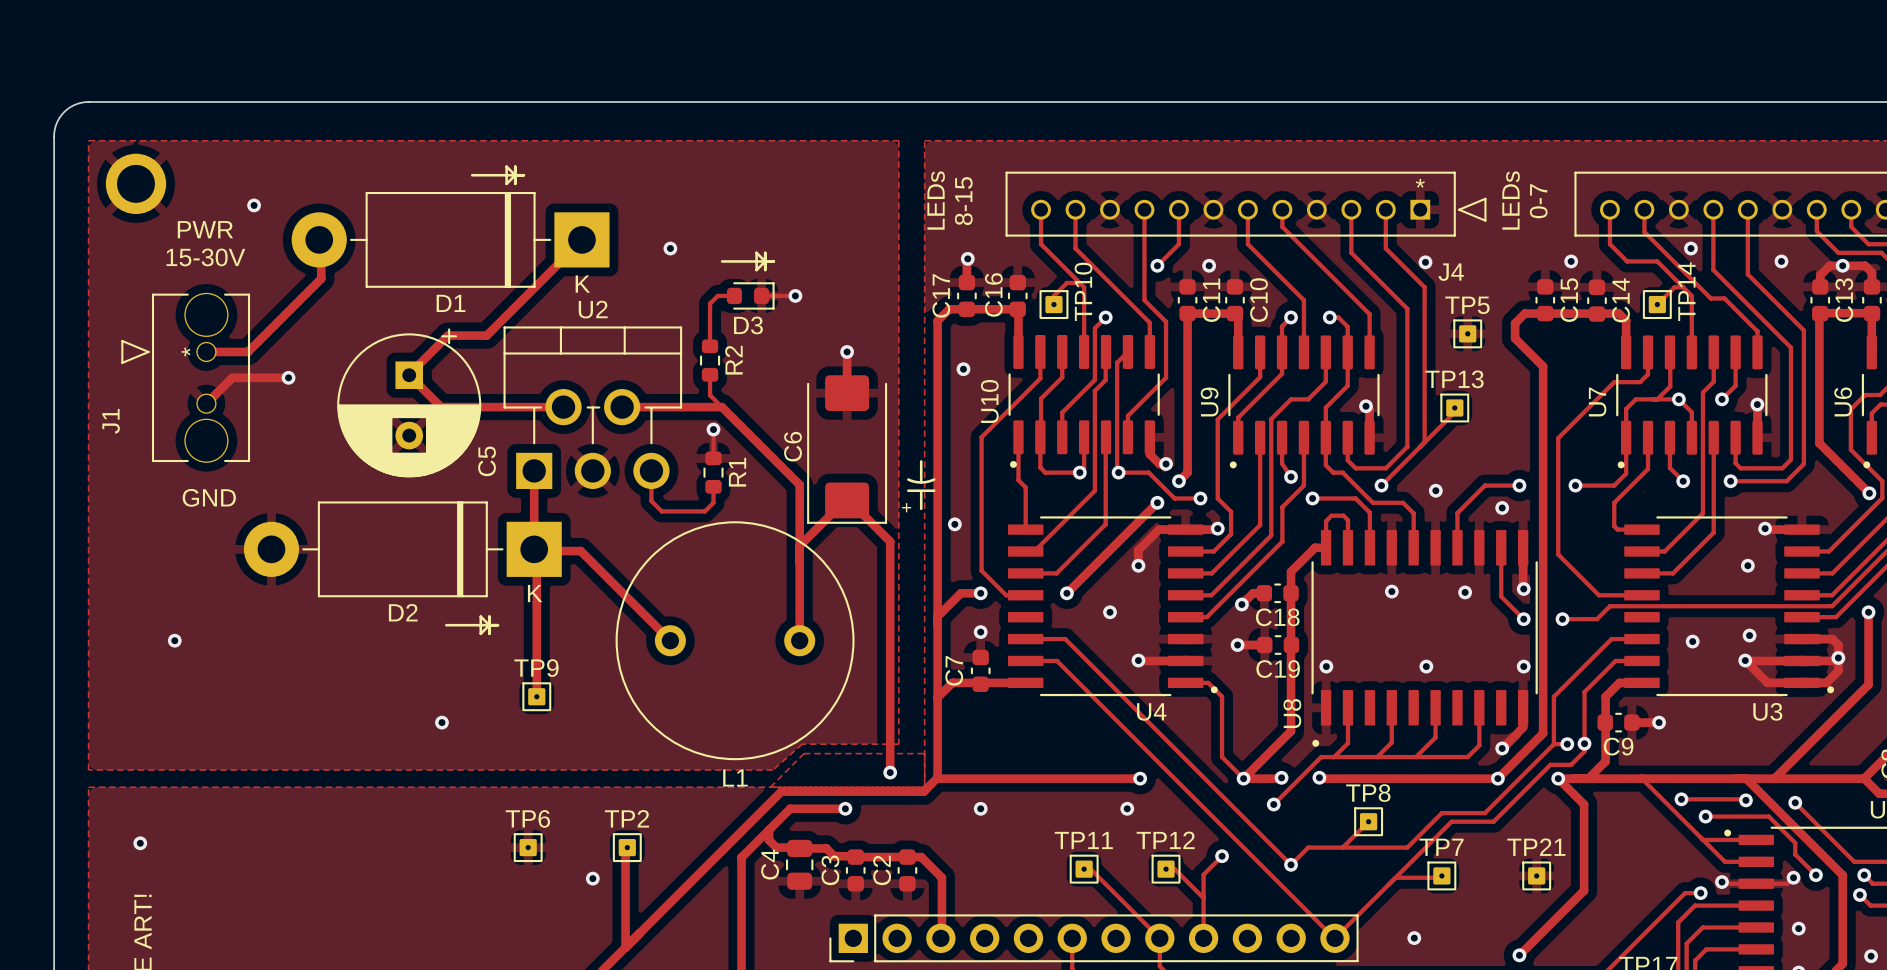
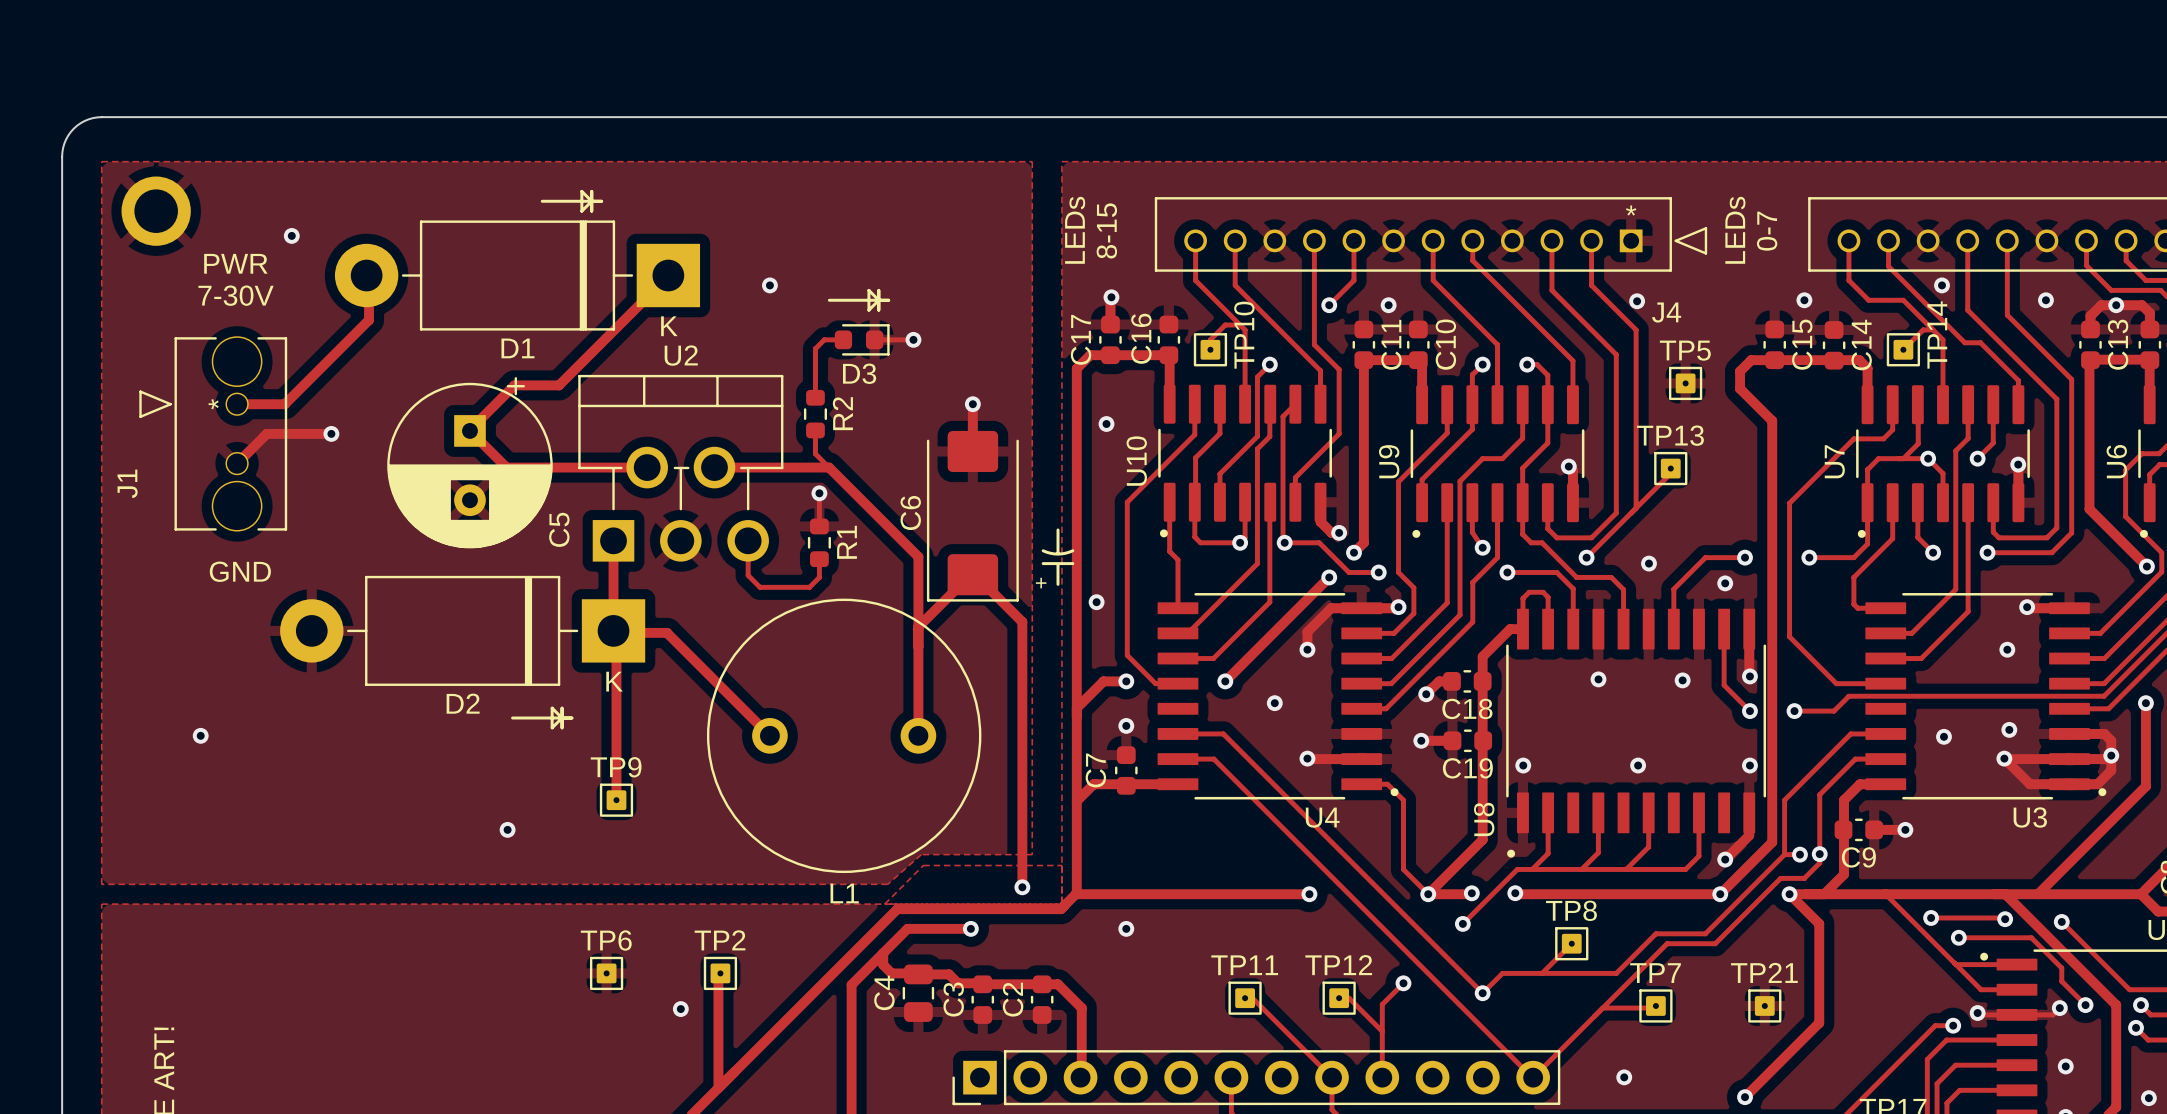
text: 15-30V (205, 257) -> 7-30V (236, 295)
via: (1127, 808) -> none
via: (140, 843) -> none

